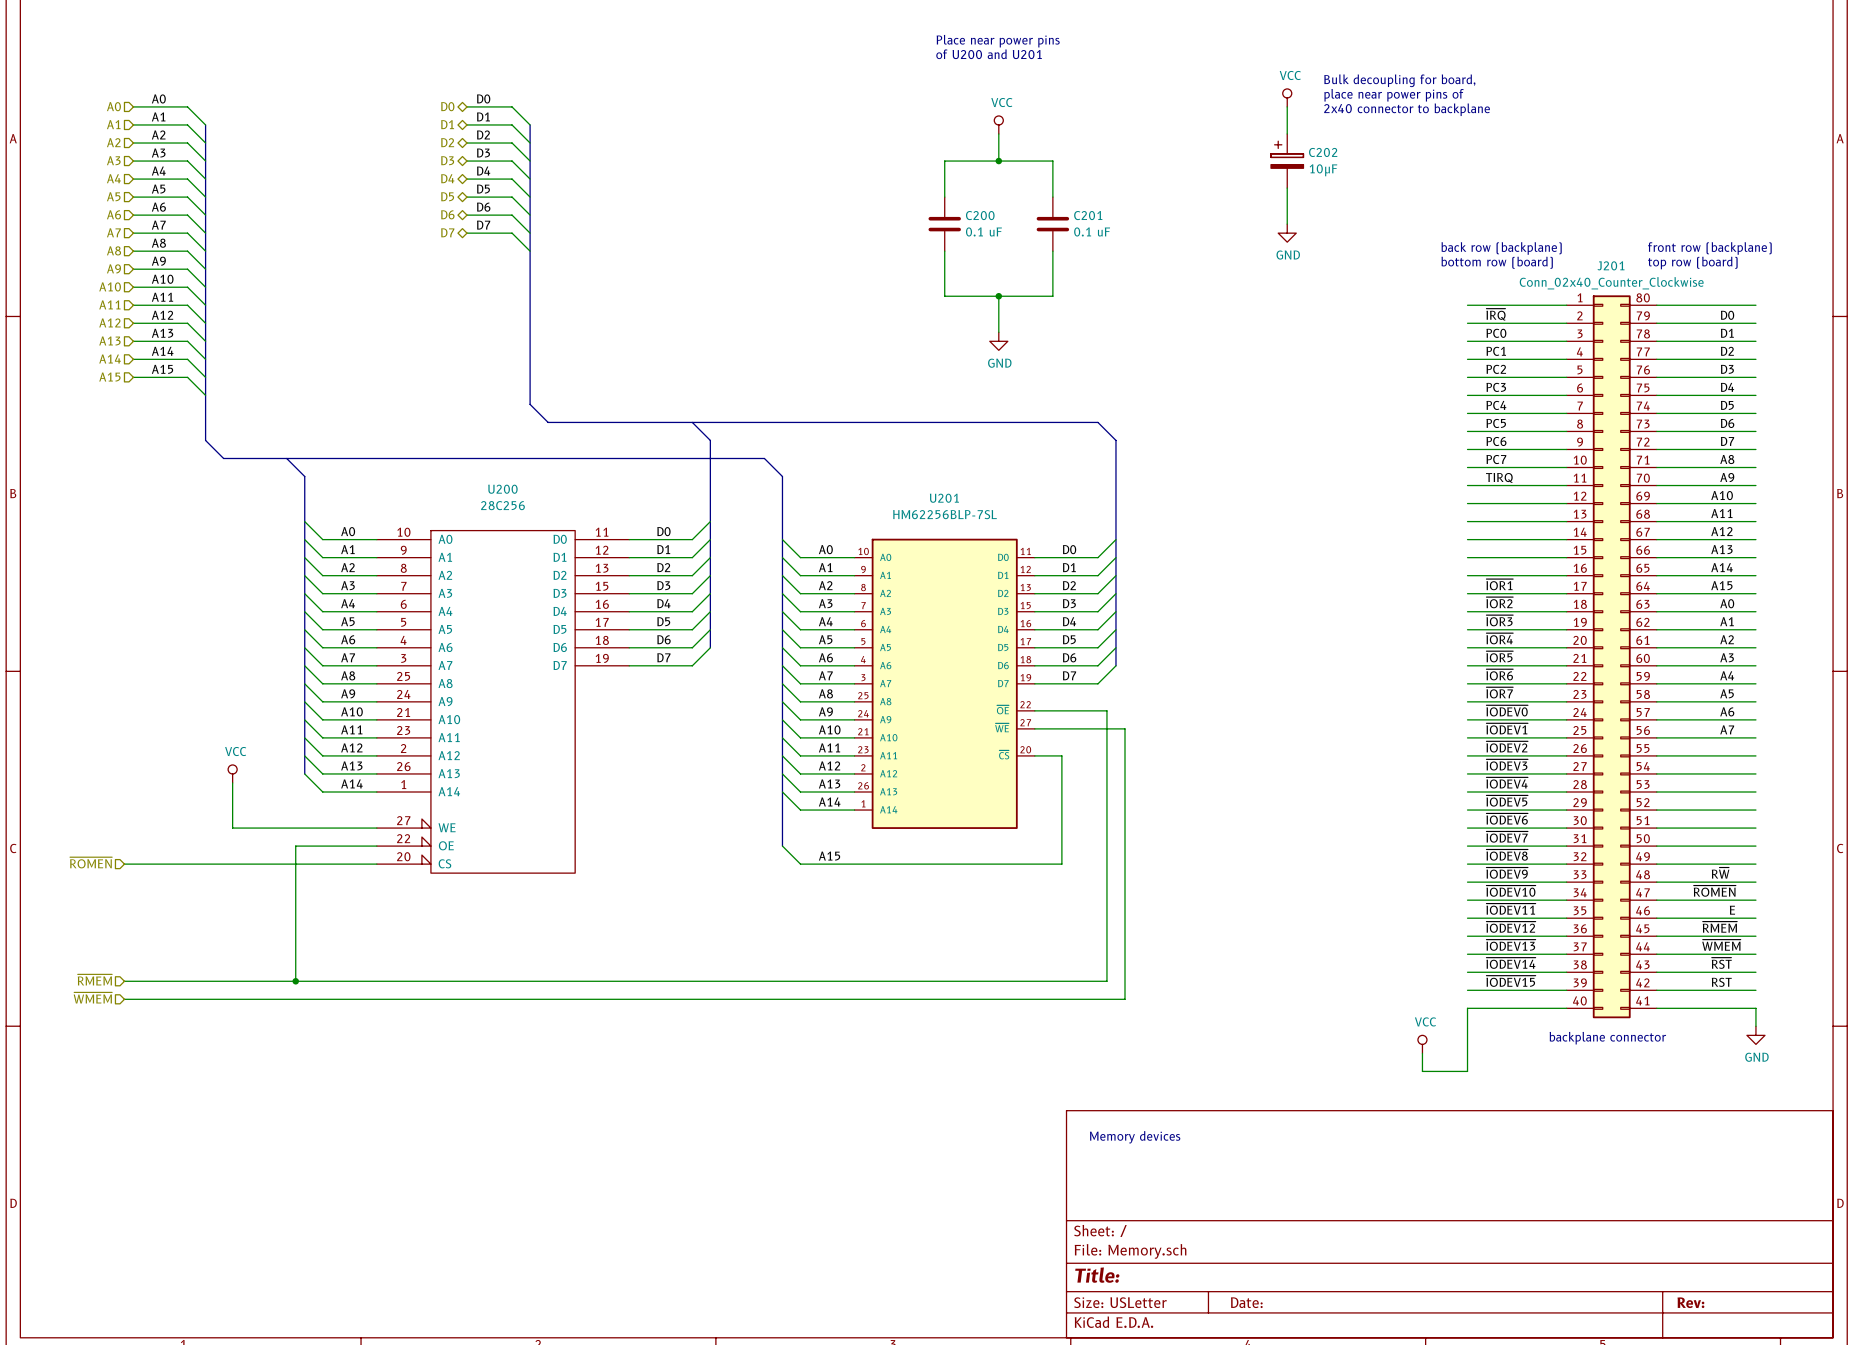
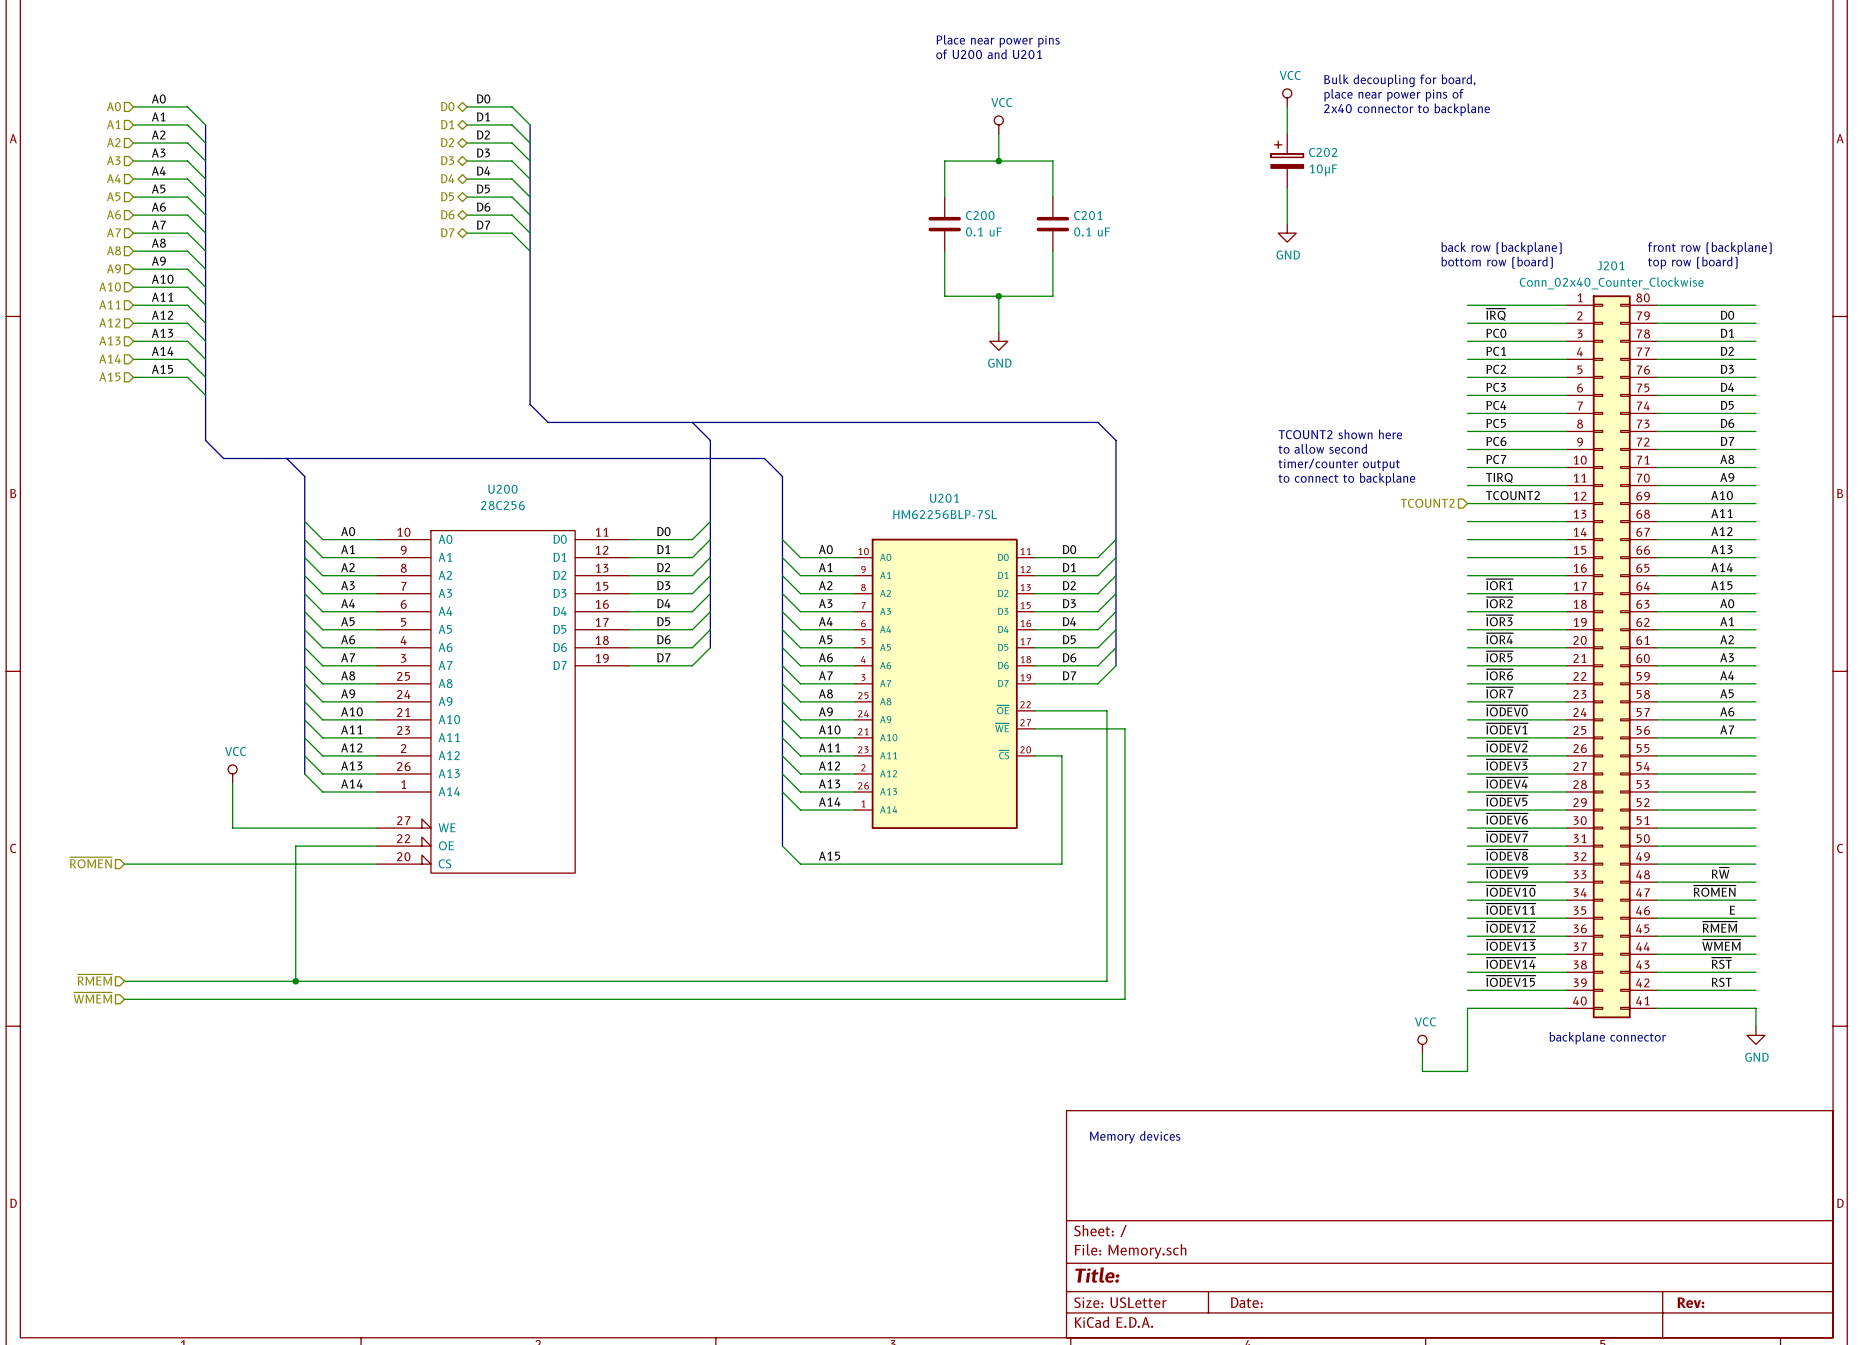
text: none -> TCOUNT2 shown here (1340, 434)
text: none -> to allow second (1322, 448)
text: none -> timer/counter output (1339, 464)
text: none -> to connect to backplane (1346, 479)
label: none -> TCOUNT2 (1512, 495)
hierarchical label: none -> TCOUNT2 (1427, 503)

